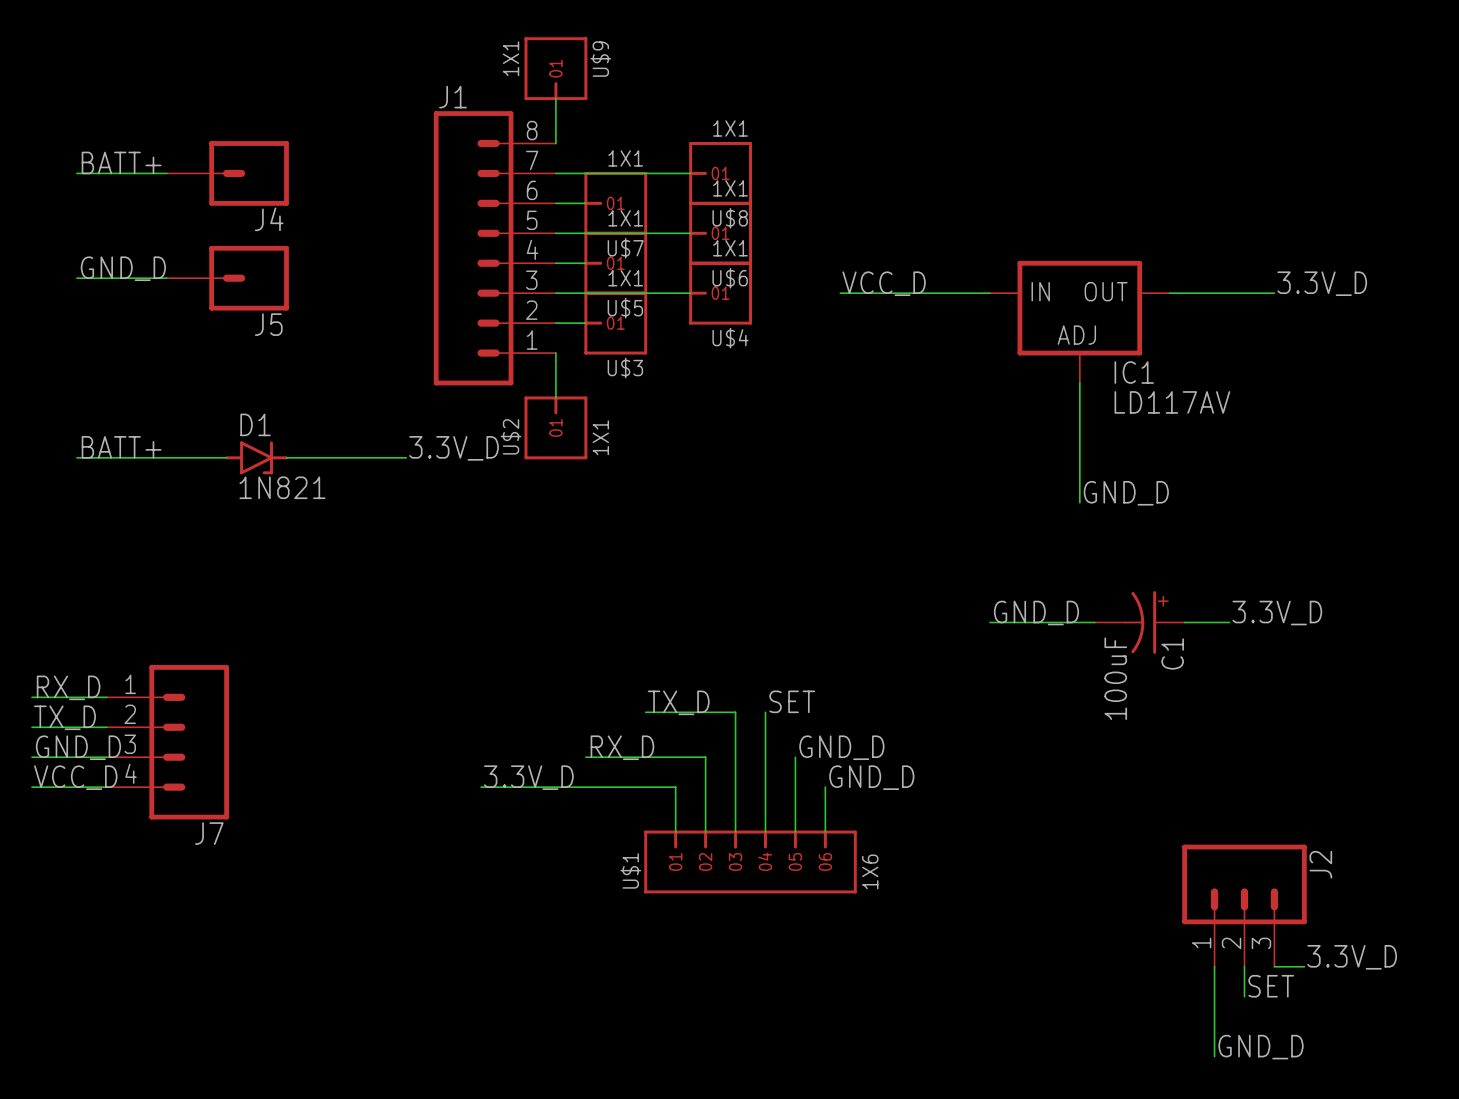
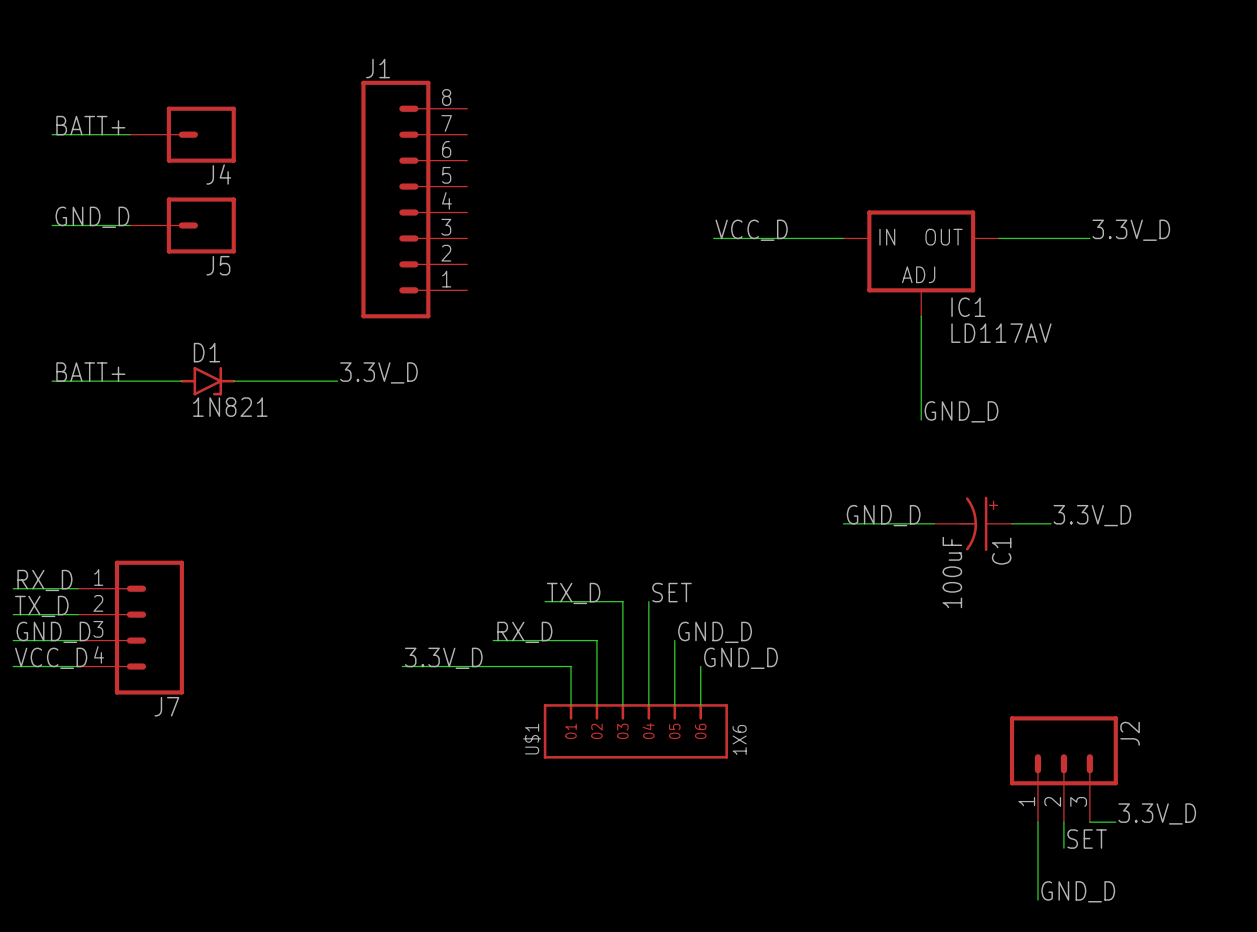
U$9: 1X1 (555, 68) -> none
wire: (555, 98) (555, 143) -> none
wire: (555, 173) (690, 173) -> none
U$8: 1X1 (720, 173) -> none
wire: (555, 203) (585, 203) -> none
U$7: 1X1 (615, 203) -> none
wire: (555, 233) (690, 233) -> none
U$6: 1X1 (720, 233) -> none
wire: (555, 263) (585, 263) -> none
U$5: 1X1 (615, 263) -> none
wire: (555, 293) (690, 293) -> none
U$4: 1X1 (720, 293) -> none
wire: (555, 323) (585, 323) -> none
U$3: 1X1 (615, 323) -> none
wire: (555, 353) (555, 397) -> none
U$2: 1X1 (555, 427) -> none

